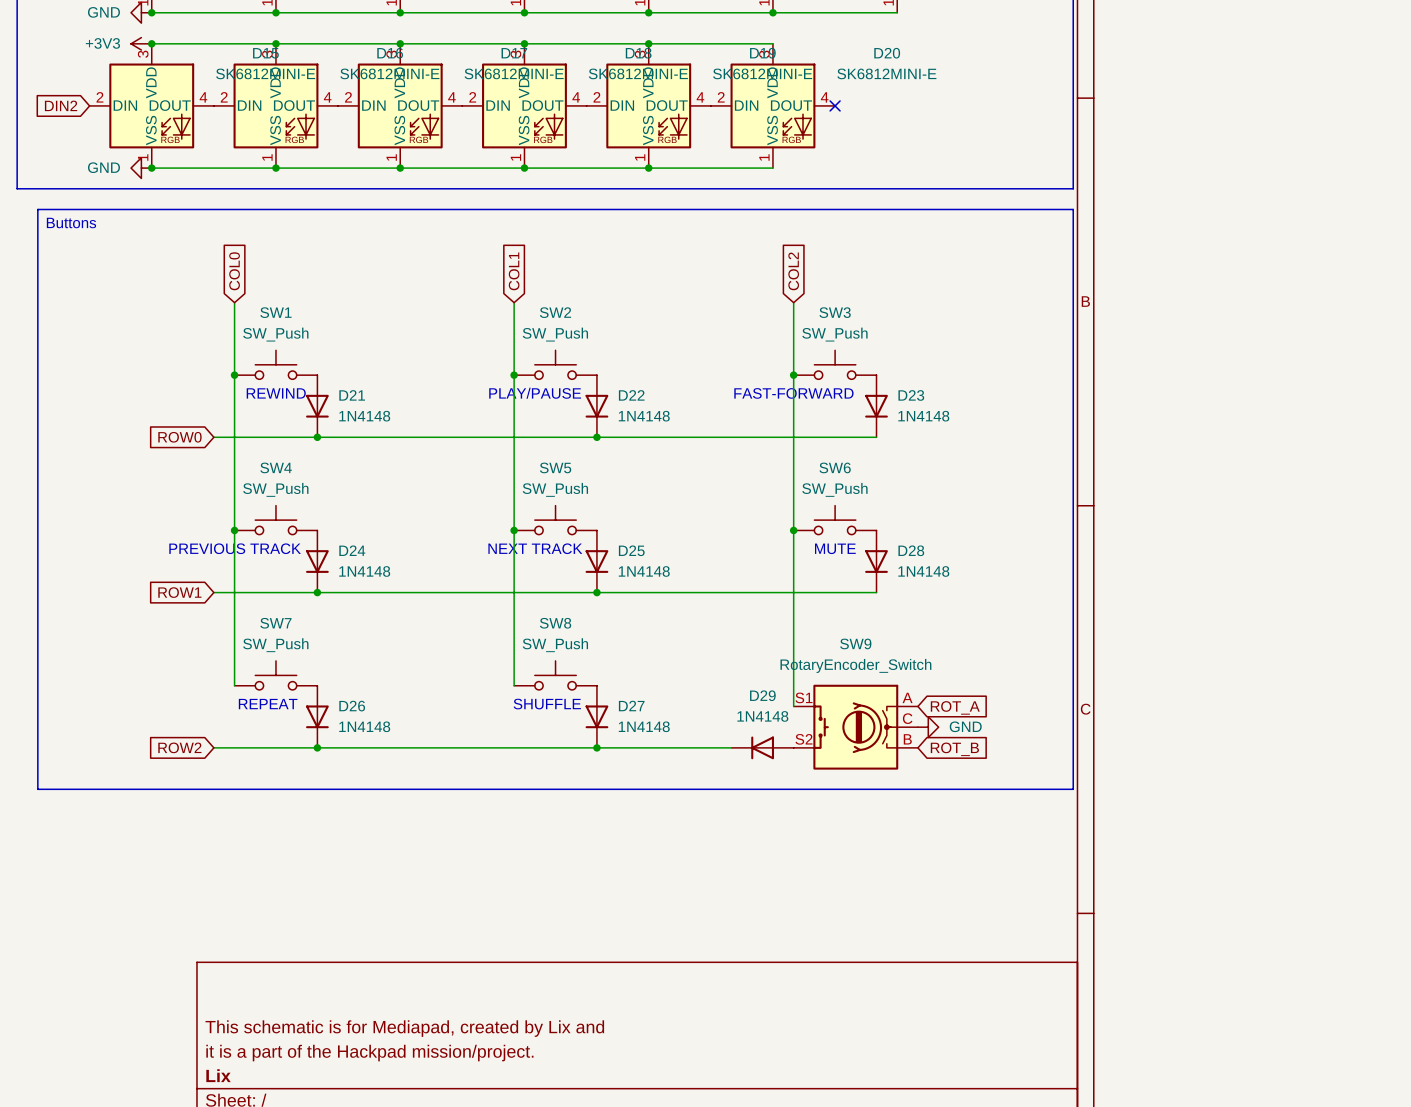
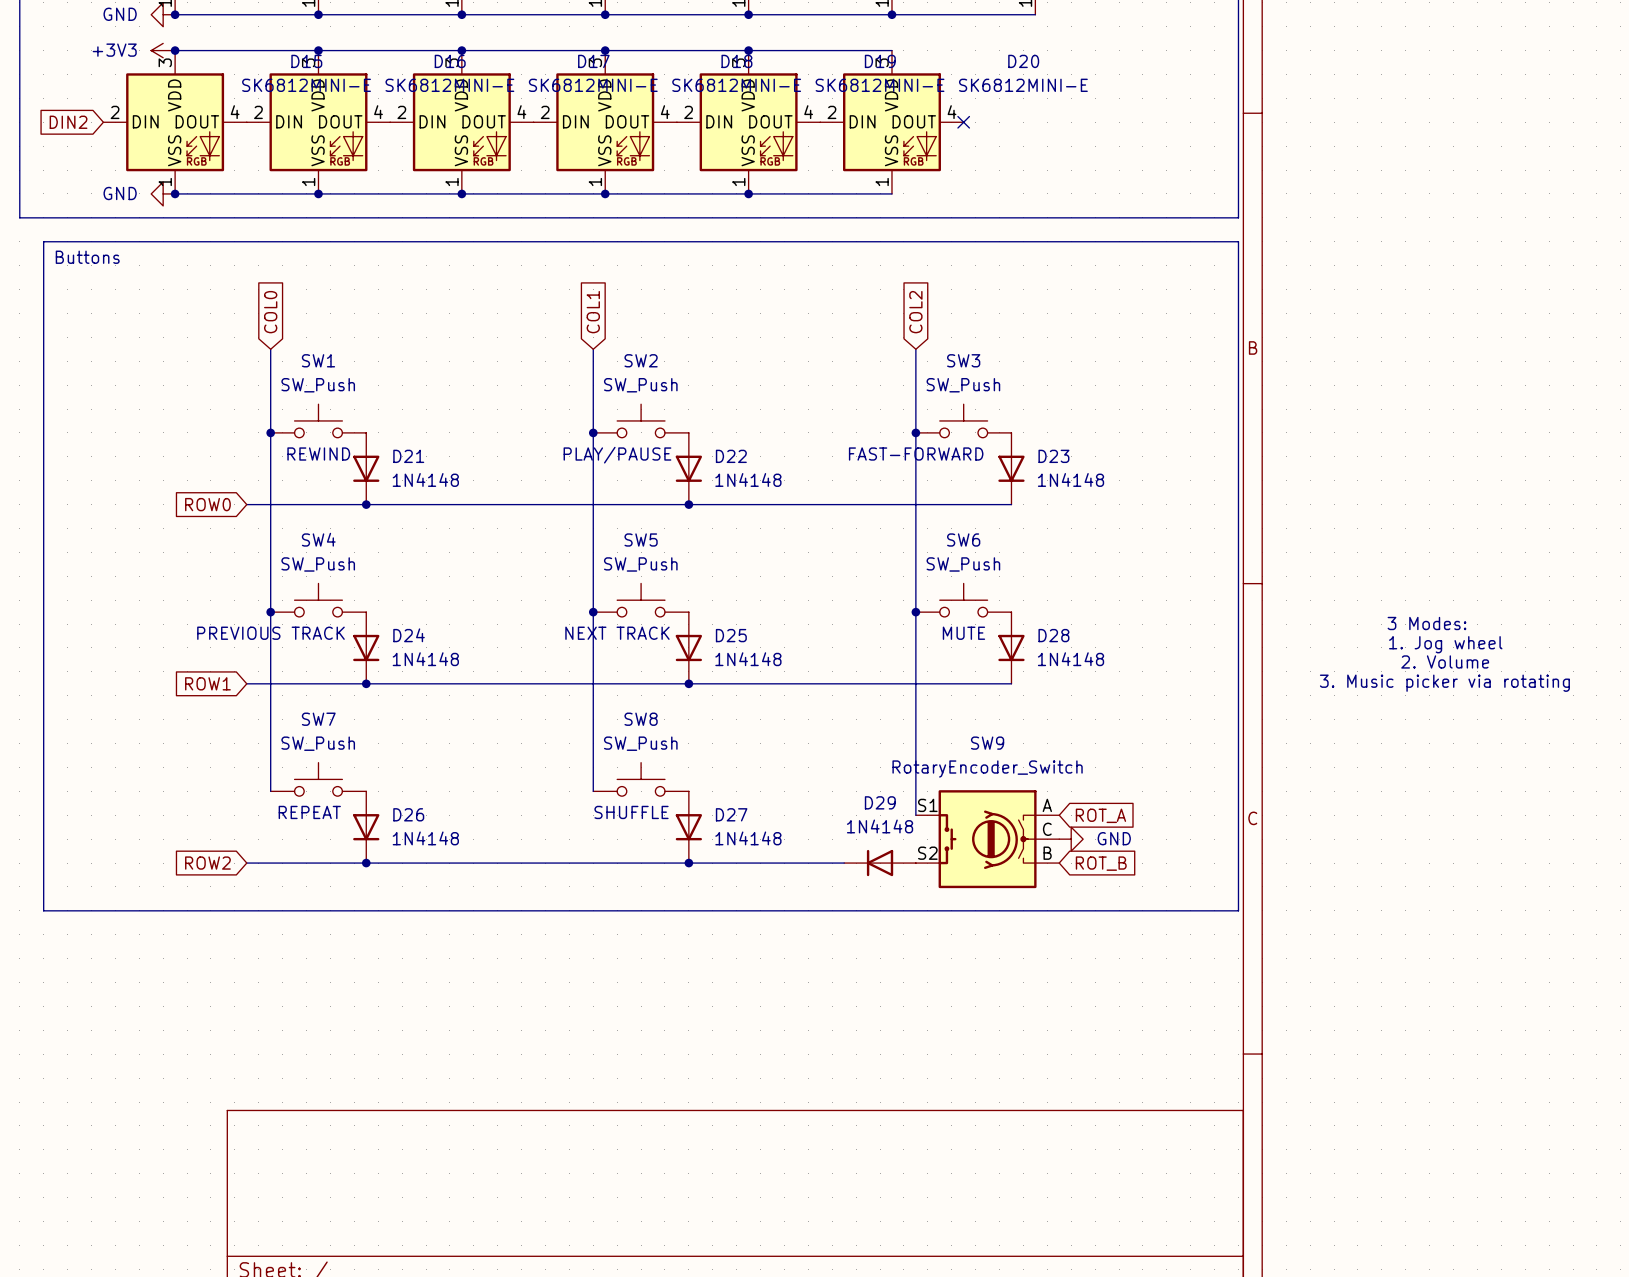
text: none -> 3 Modes: (1426, 623)
text: none -> 1. Jog wheel (1445, 644)
text: none -> 2. Volume (1445, 661)
text: none -> 3. Music picker via rotating (1444, 683)
title block: This schematic is for Mediapad, created by Lix and (404, 1028) -> none
title block: it is a part of the Hackpad mission/project. (369, 1053) -> none
title block: Lix (218, 1075) -> none

